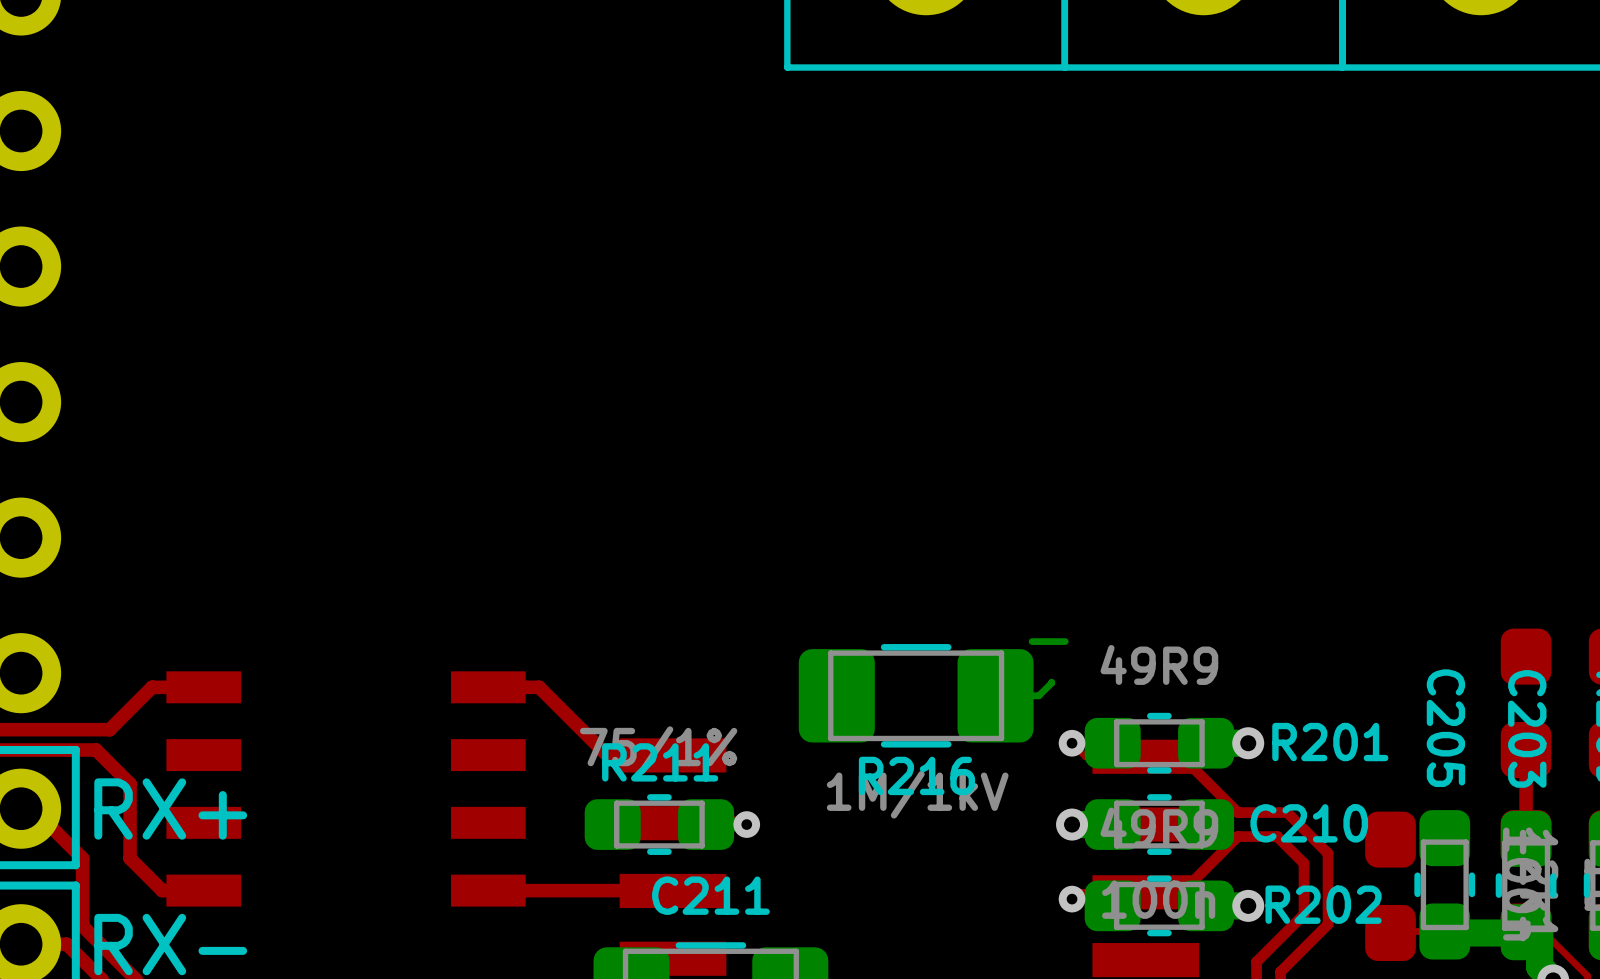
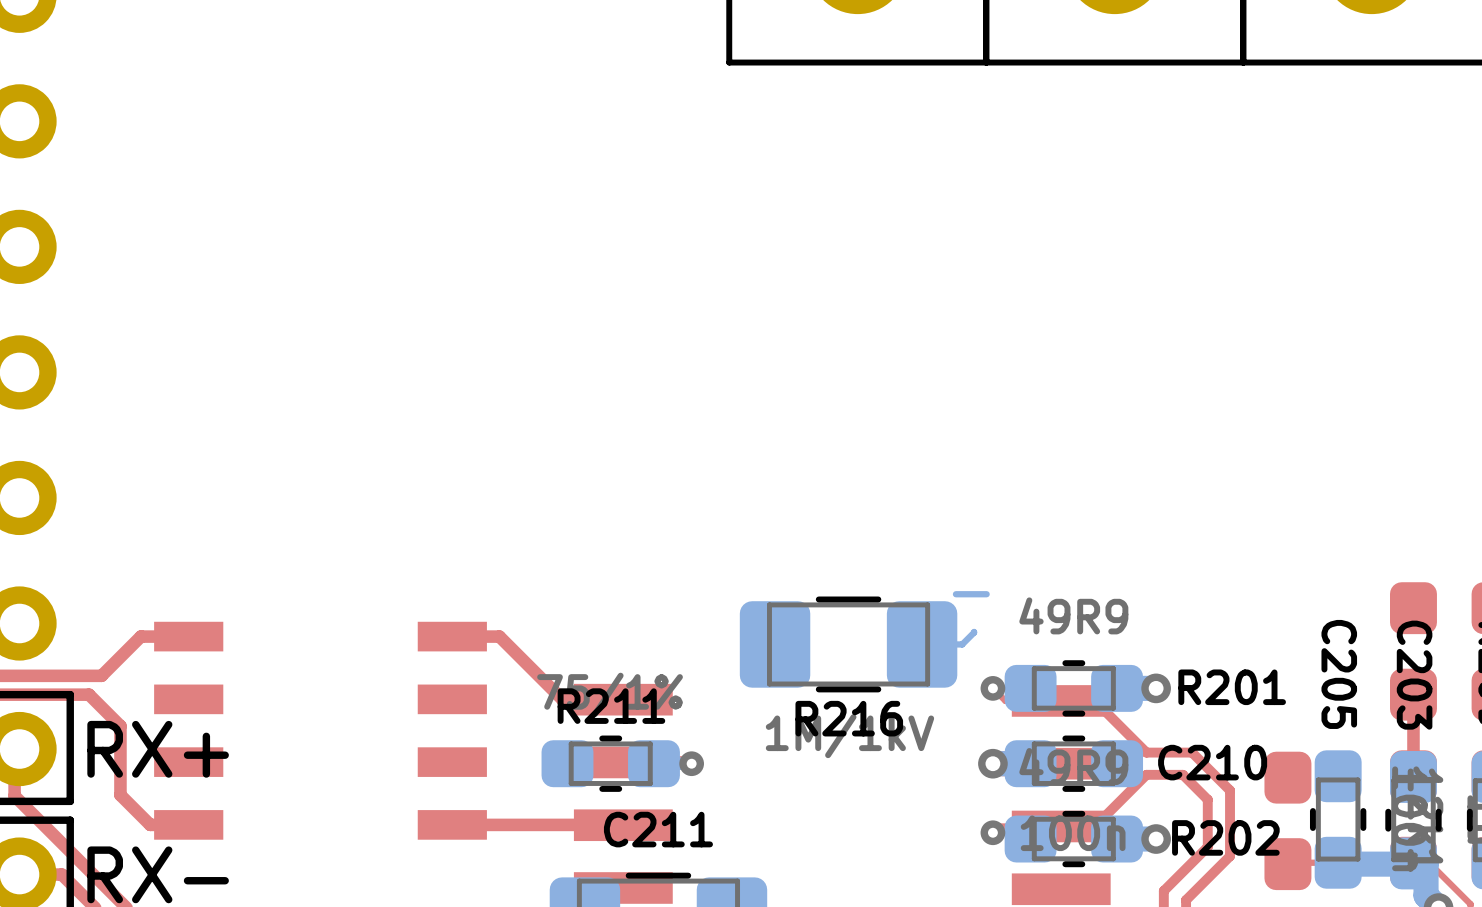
top track: (15, 808) (32, 808) (82, 858) (82, 926) -> (14, 749) (14, 795) (76, 857)

